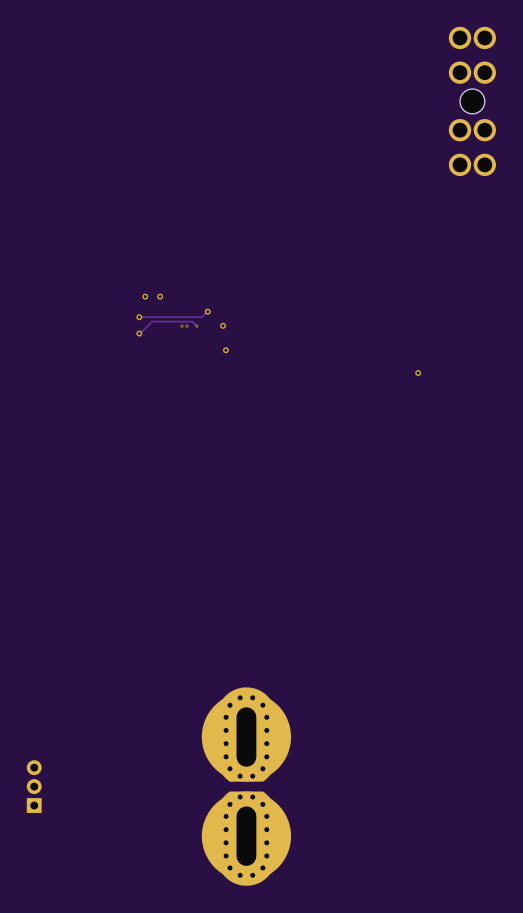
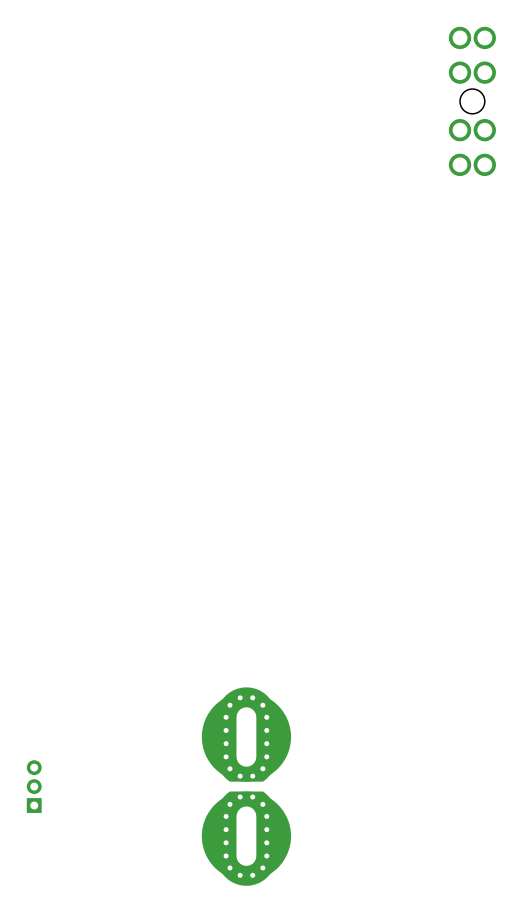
via: (145, 296) -> none
via: (160, 296) -> none
track: (207, 311) (201, 317) (139, 317) -> none
via: (207, 311) -> none
via: (139, 317) -> none
via: (222, 325) -> none
via: (181, 326) -> none
via: (186, 326) -> none
track: (196, 326) (192, 321) (151, 321) (139, 333) -> none
via: (196, 326) -> none
via: (139, 333) -> none
via: (225, 350) -> none
via: (418, 373) -> none

